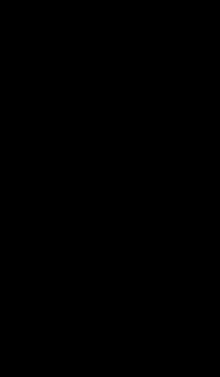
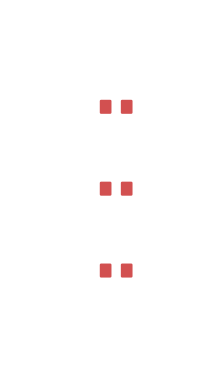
part: none -> (116, 106)
part: none -> (116, 188)
part: none -> (116, 270)

